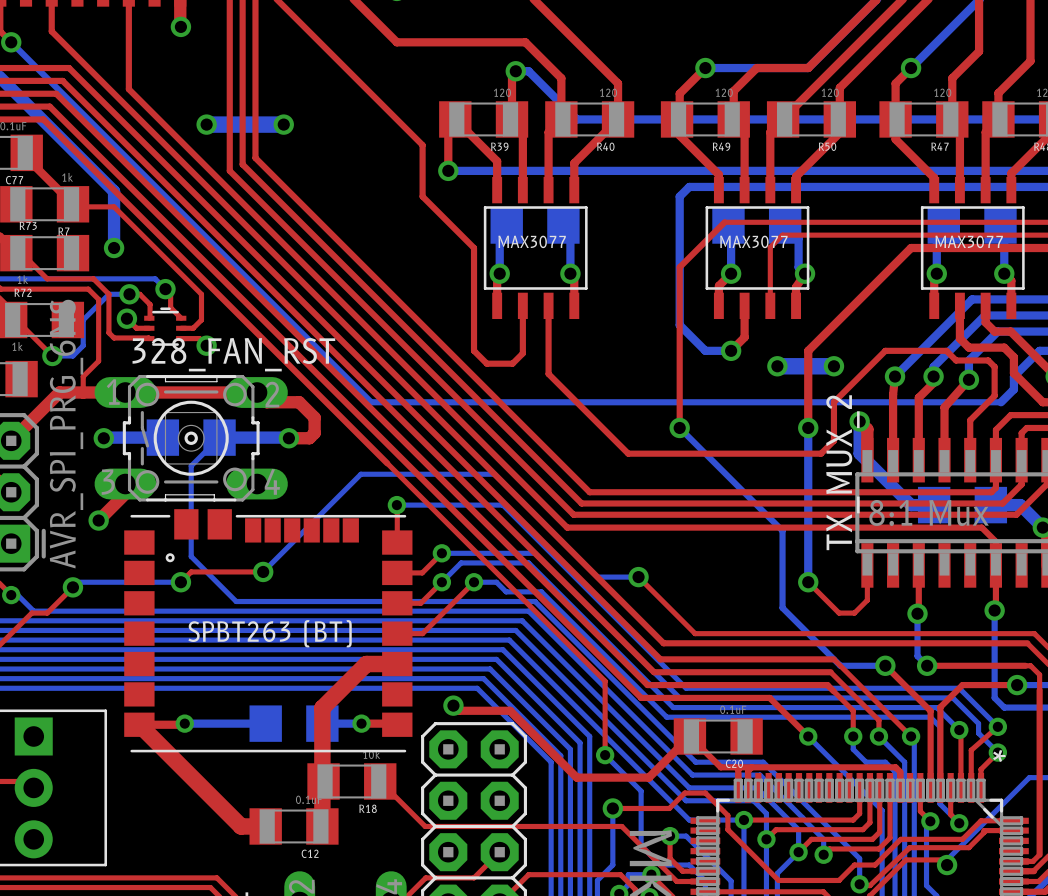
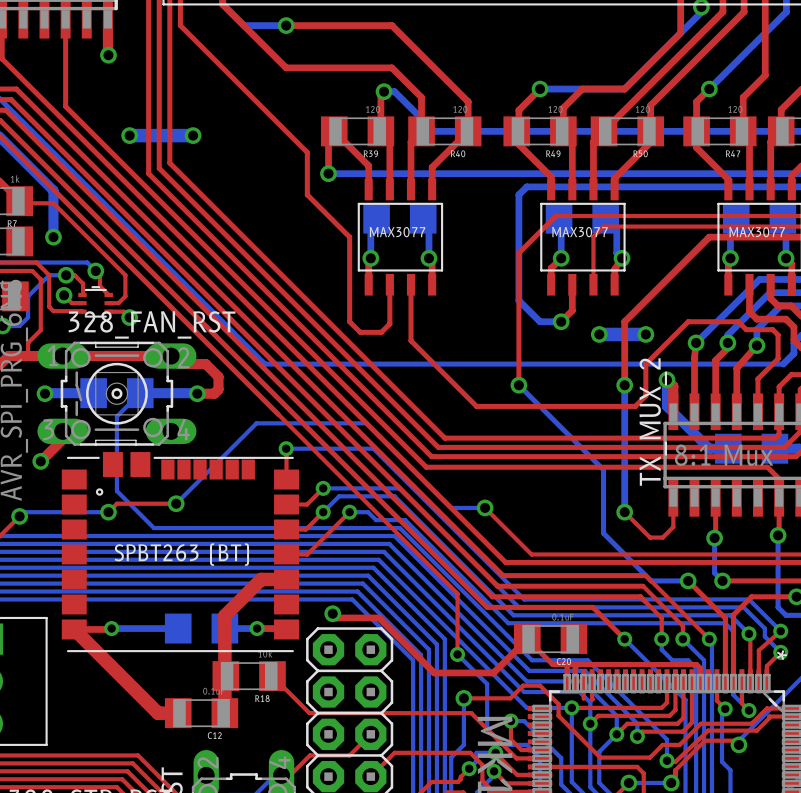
top track: none -> (592, 681) (592, 699)
top track: none -> (583, 687) (583, 698)

